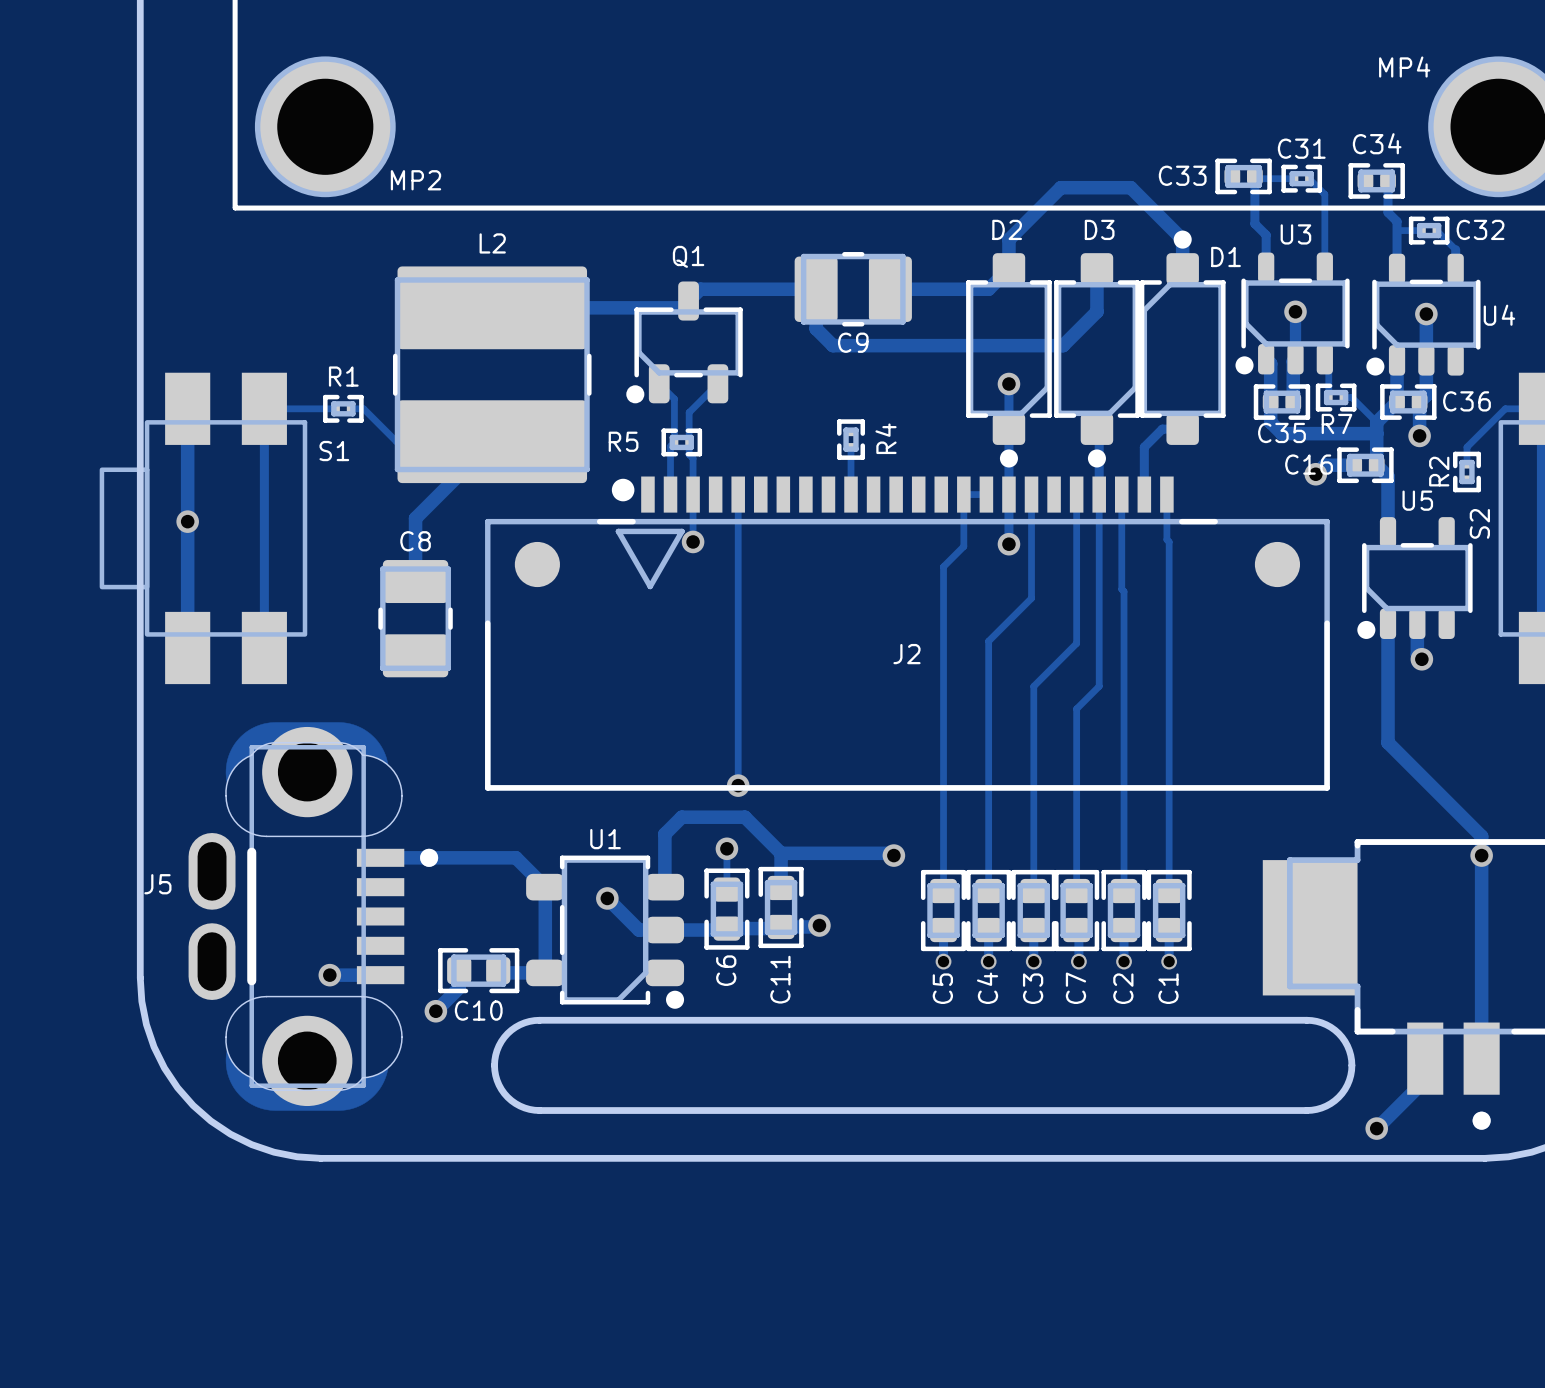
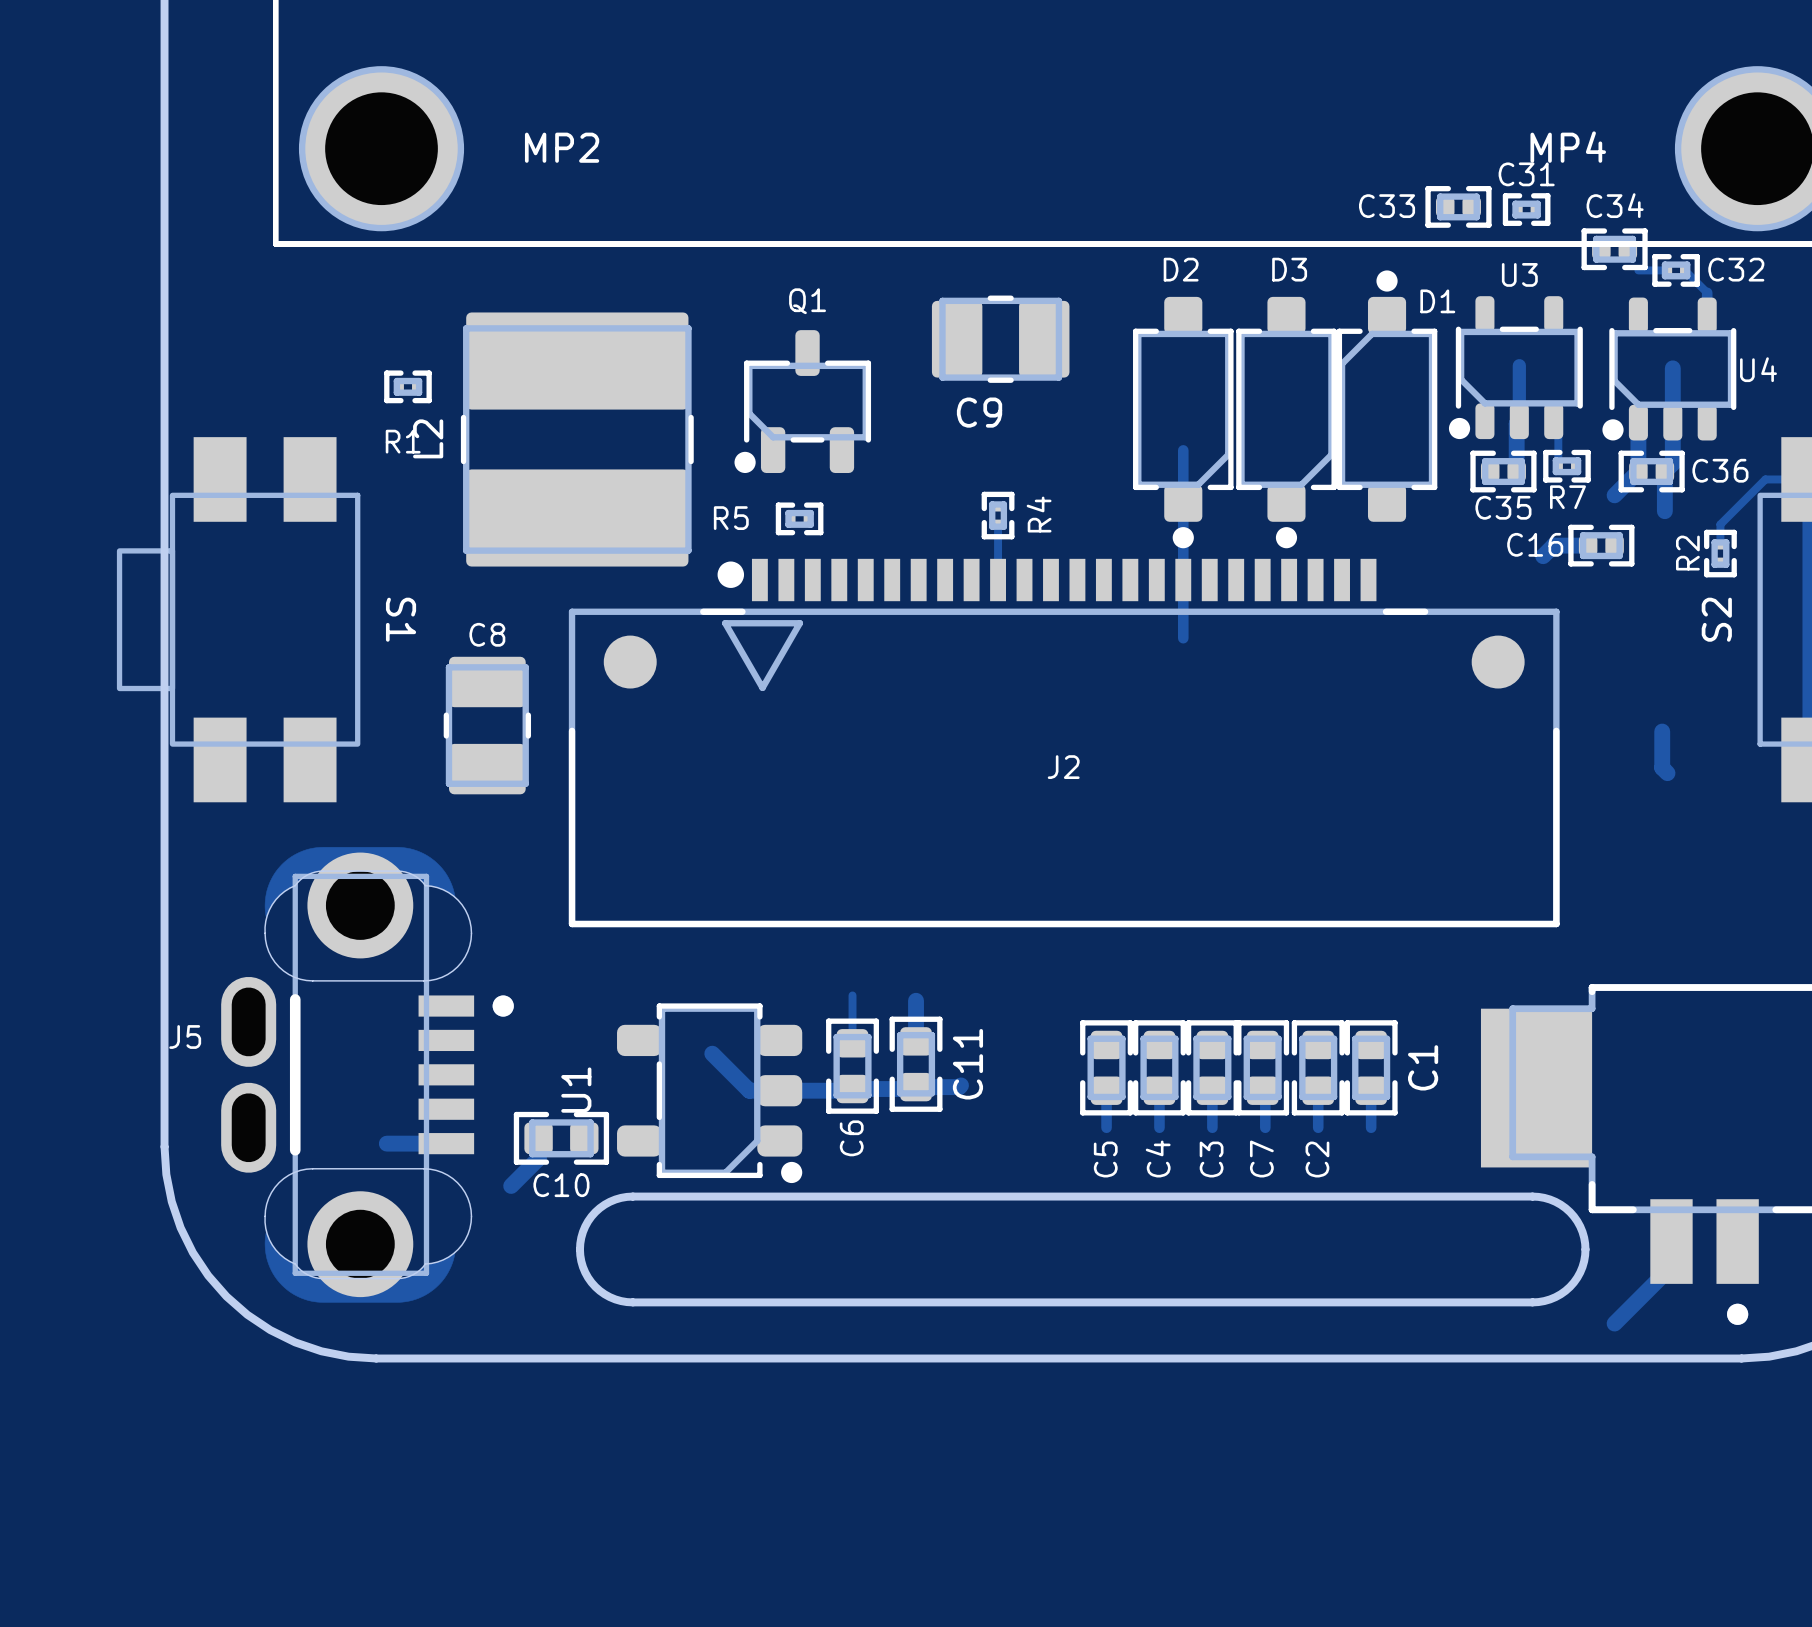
MP4 name position: MP4 (1404, 67) -> MP4 (1568, 147)
track: (1294, 178) (1257, 178) (1254, 176) (1254, 223) (1266, 235) (1266, 267) -> none
track: (1309, 178) (1324, 194) (1324, 267) -> none
MP2 name position: MP2 (415, 180) -> MP2 (562, 147)
C34 position: (1376, 180) -> (1614, 249)
track: (1388, 180) (1388, 212) (1397, 221) (1397, 268) -> none
L2 name rotation: 0° (492, 243) -> 90° counterclockwise (428, 438)
L2 name position: L2 (492, 243) -> L2 (428, 438)
track: (1096, 268) (1096, 311) (1063, 345) (832, 345) (816, 328) (816, 289) (700, 289) (681, 307) (492, 307) -> none
track: (1182, 268) (1182, 239) (1130, 187) (1060, 187) (1008, 239) (1008, 268) (988, 289) (890, 289) -> none
via: (1295, 311) -> none
via: (1426, 314) -> none
C9 name position: C9 (853, 342) -> C9 (979, 412)
track: (1266, 359) (1270, 363) (1270, 422) (1281, 433) (1376, 433) -> none
track: (659, 383) (674, 398) (674, 442) (670, 446) (670, 494) -> none
track: (717, 383) (689, 412) (689, 454) (693, 458) (693, 541) -> none
via: (1008, 384) -> none
track: (1343, 397) (1351, 397) (1376, 422) (1376, 465) (1388, 476) (1388, 532) -> none
track: (187, 408) (187, 647) -> none
track: (336, 408) (264, 408) (264, 647) -> none
R1 position: (343, 408) -> (407, 386)
track: (350, 408) (363, 408) (396, 441) (492, 441) (415, 518) (415, 581) -> none
track: (1096, 429) (1099, 431) (1099, 686) (1076, 708) (1076, 891) -> none
track: (1182, 429) (1162, 429) (1144, 447) (1144, 494) -> none
via: (1419, 435) -> none
S1 name rotation: 0° (334, 451) -> 90° clockwise (401, 619)
S1 name position: S1 (334, 451) -> S1 (401, 619)
via: (1315, 474) -> none
track: (738, 494) (738, 785) -> none
track: (986, 494) (963, 494) (963, 546) (943, 566) (943, 891) -> none
track: (1031, 494) (1031, 598) (988, 641) (988, 891) -> none
track: (1076, 494) (1076, 643) (1033, 686) (1033, 891) -> none
track: (1121, 494) (1121, 589) (1124, 591) (1124, 891) -> none
track: (1166, 494) (1166, 539) (1169, 541) (1169, 891) -> none
via: (187, 521) -> none
S2 name position: S2 (1479, 523) -> S2 (1716, 619)
via: (693, 541) -> none
via: (1008, 544) -> none
U5: (1414, 578) -> none
track: (1388, 623) (1388, 742) (1481, 836) (1481, 1058) -> none
via: (1421, 659) -> none
via: (738, 785) -> none
U1 name rotation: 0° (605, 839) -> 90° counterclockwise (576, 1090)
U1 name position: U1 (605, 839) -> U1 (576, 1090)
via: (726, 848) -> none
track: (893, 855) (891, 853) (781, 853) (744, 817) (681, 817) (664, 834) (664, 887) -> none
via: (893, 855) -> none
via: (1481, 855) -> none
track: (380, 857) (515, 857) (545, 887) (545, 972) (500, 972) (498, 970) -> none
via: (607, 898) -> none
via: (819, 925) -> none
via: (943, 961) -> none
via: (988, 961) -> none
via: (1033, 961) -> none
via: (1078, 961) -> none
via: (1124, 961) -> none
via: (1169, 961) -> none
via: (329, 975) -> none
C11 name position: C11 (780, 979) -> C11 (967, 1064)
C1 name position: C1 (1168, 988) -> C1 (1423, 1067)
via: (435, 1011) -> none
via: (1376, 1128) -> none

